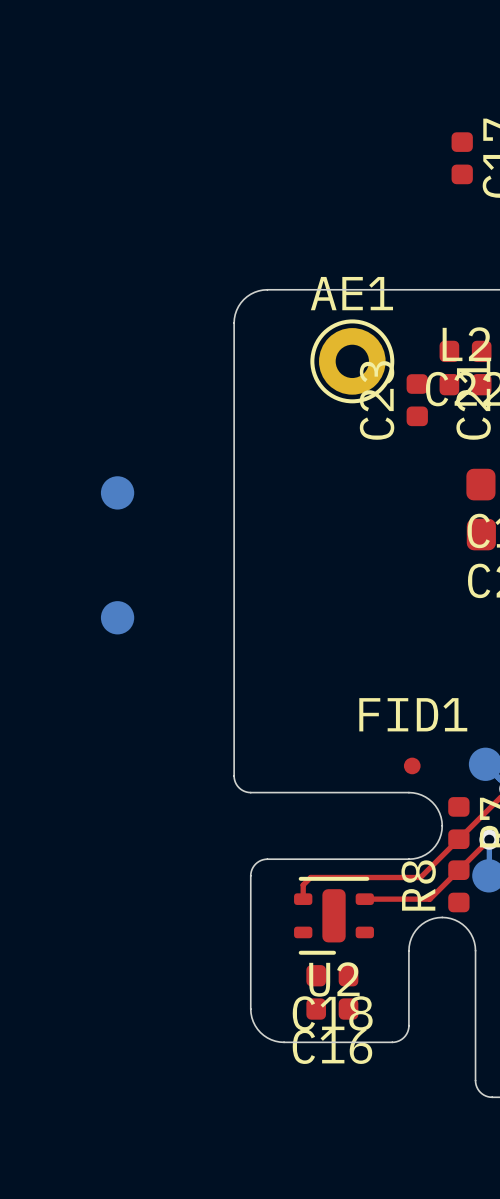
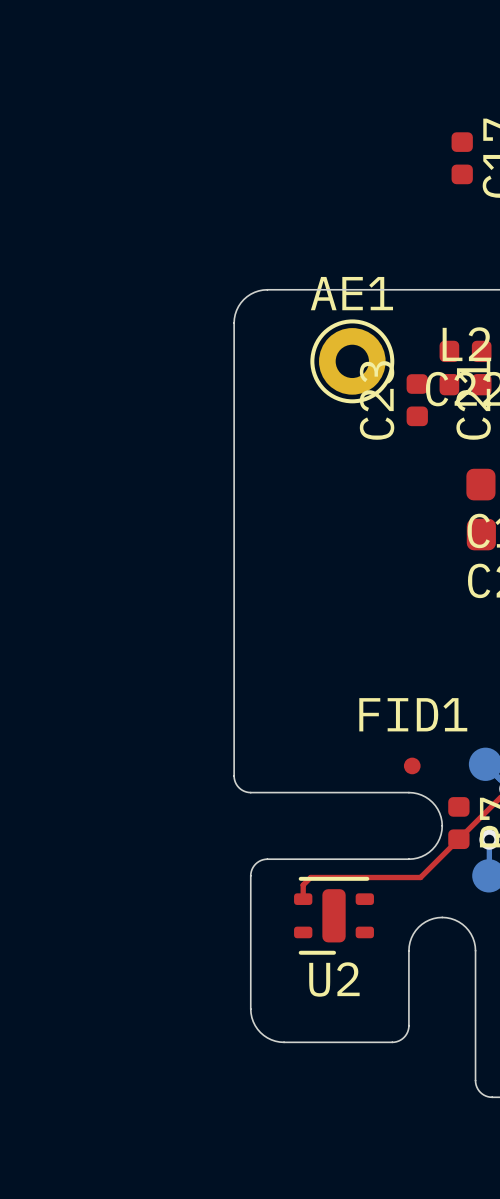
part: (117, 492) -> none
part: (117, 617) -> none
top track: (489, 839) (429, 899) (364, 899) -> none
R8: (458, 886) -> none
C18: (332, 975) -> none
C16: (332, 1009) -> none

